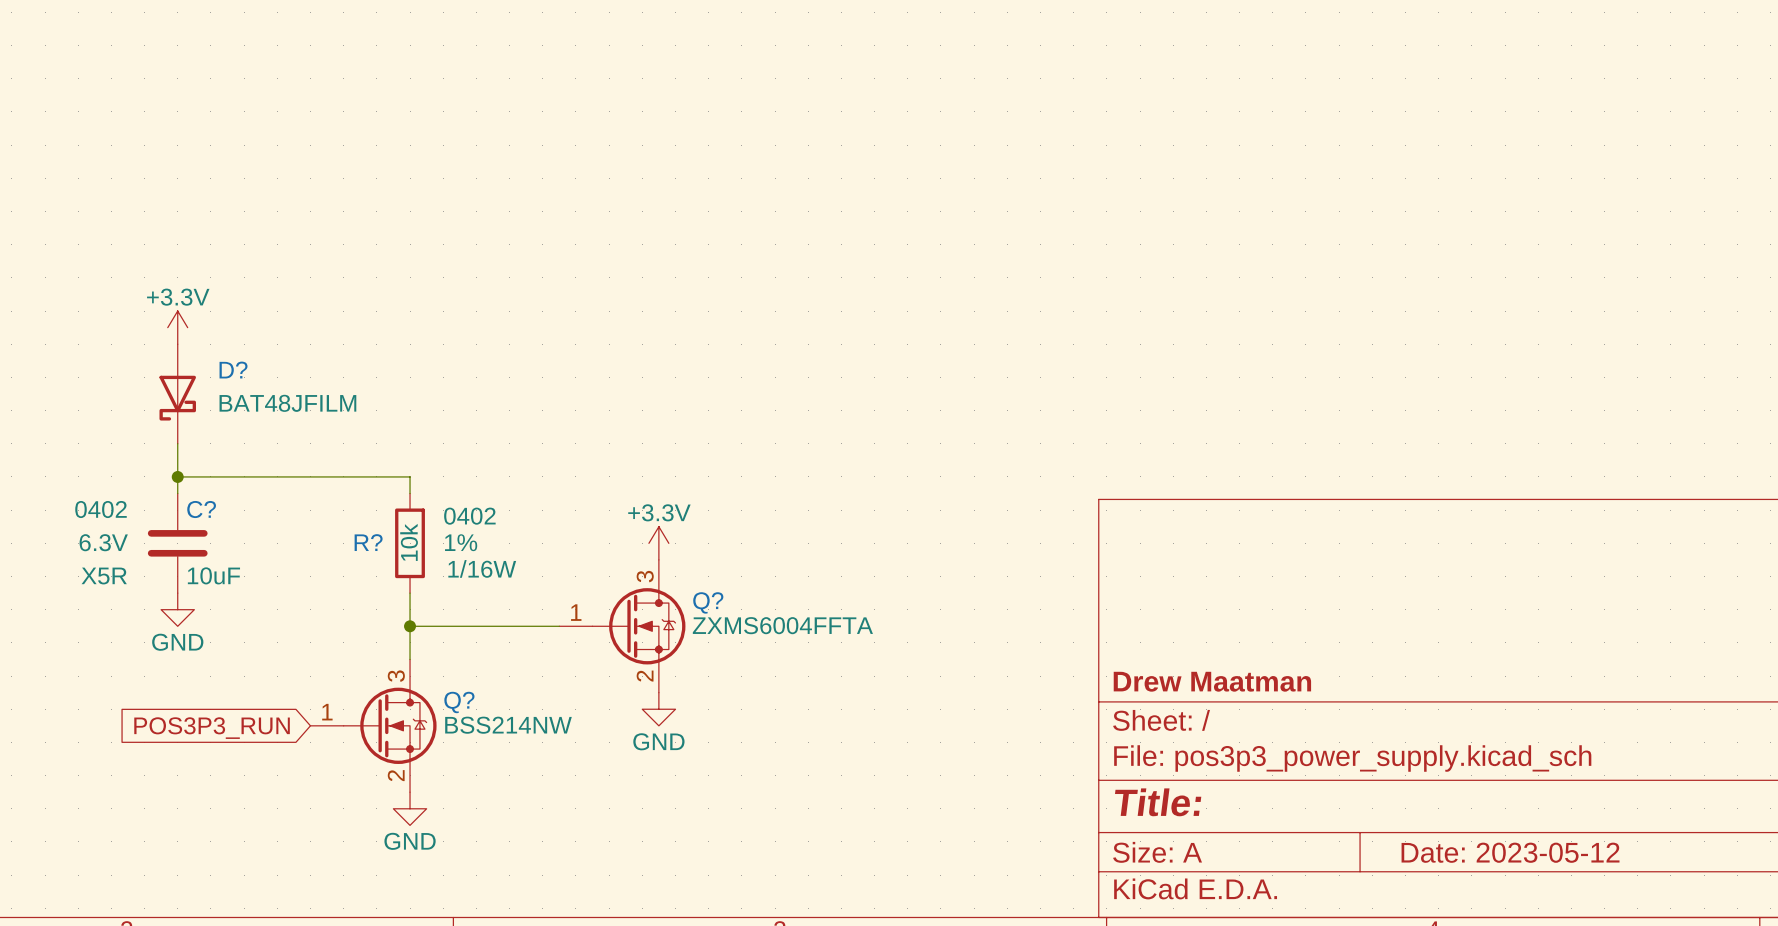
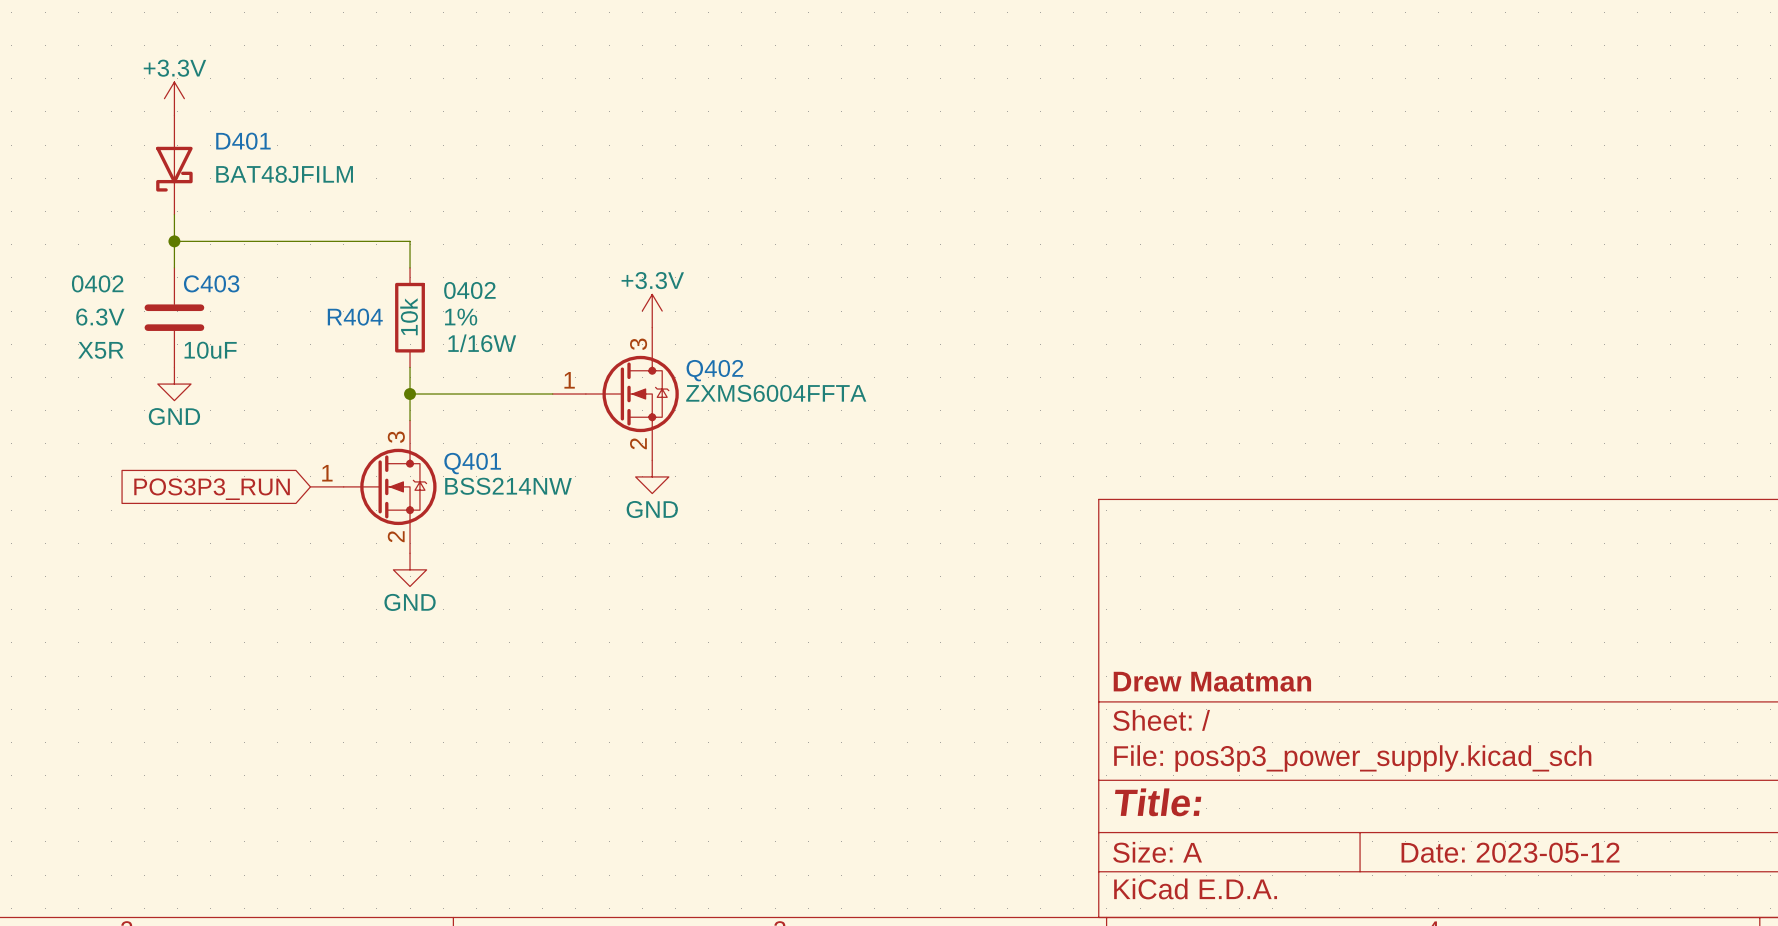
D401: none -> BAT48JFILM (174, 165)
wire: none -> (174, 214) (174, 267)
wire: none -> (174, 241) (410, 241) (410, 267)
junction: none -> (174, 241)
C403: none -> 10uF (174, 317)
R404: none -> 10k (410, 317)
power symbol position: +3.3V (177, 327) -> +3.3V (174, 98)
wire: none -> (410, 367) (410, 420)
power symbol: none -> GND (174, 384)
D?: BAT48JFILM (177, 394) -> none
wire: none -> (410, 394) (552, 394)
junction: none -> (410, 394)
Q402: none -> ZXMS6004FFTA (615, 394)
wire: (177, 443) (177, 493) -> none
wire: (177, 476) (410, 476) (410, 493) -> none
junction: (177, 476) -> none
power symbol: none -> GND (652, 476)
Q401: none -> BSS214NW (373, 486)
C?: 10uF (177, 543) -> none
R?: 10k (410, 543) -> none
power symbol position: +3.3V (658, 543) -> +3.3V (652, 311)
power symbol: none -> GND (410, 569)
wire: (410, 593) (410, 659) -> none
power symbol: GND (177, 609) -> none
wire: (410, 626) (559, 626) -> none
junction: (410, 626) -> none
Q?: ZXMS6004FFTA (622, 626) -> none
power symbol: GND (658, 709) -> none
Q?: BSS214NW (373, 725) -> none
global label position: POS3P3_RUN (212, 728) -> POS3P3_RUN (212, 489)
power symbol: GND (410, 808) -> none

